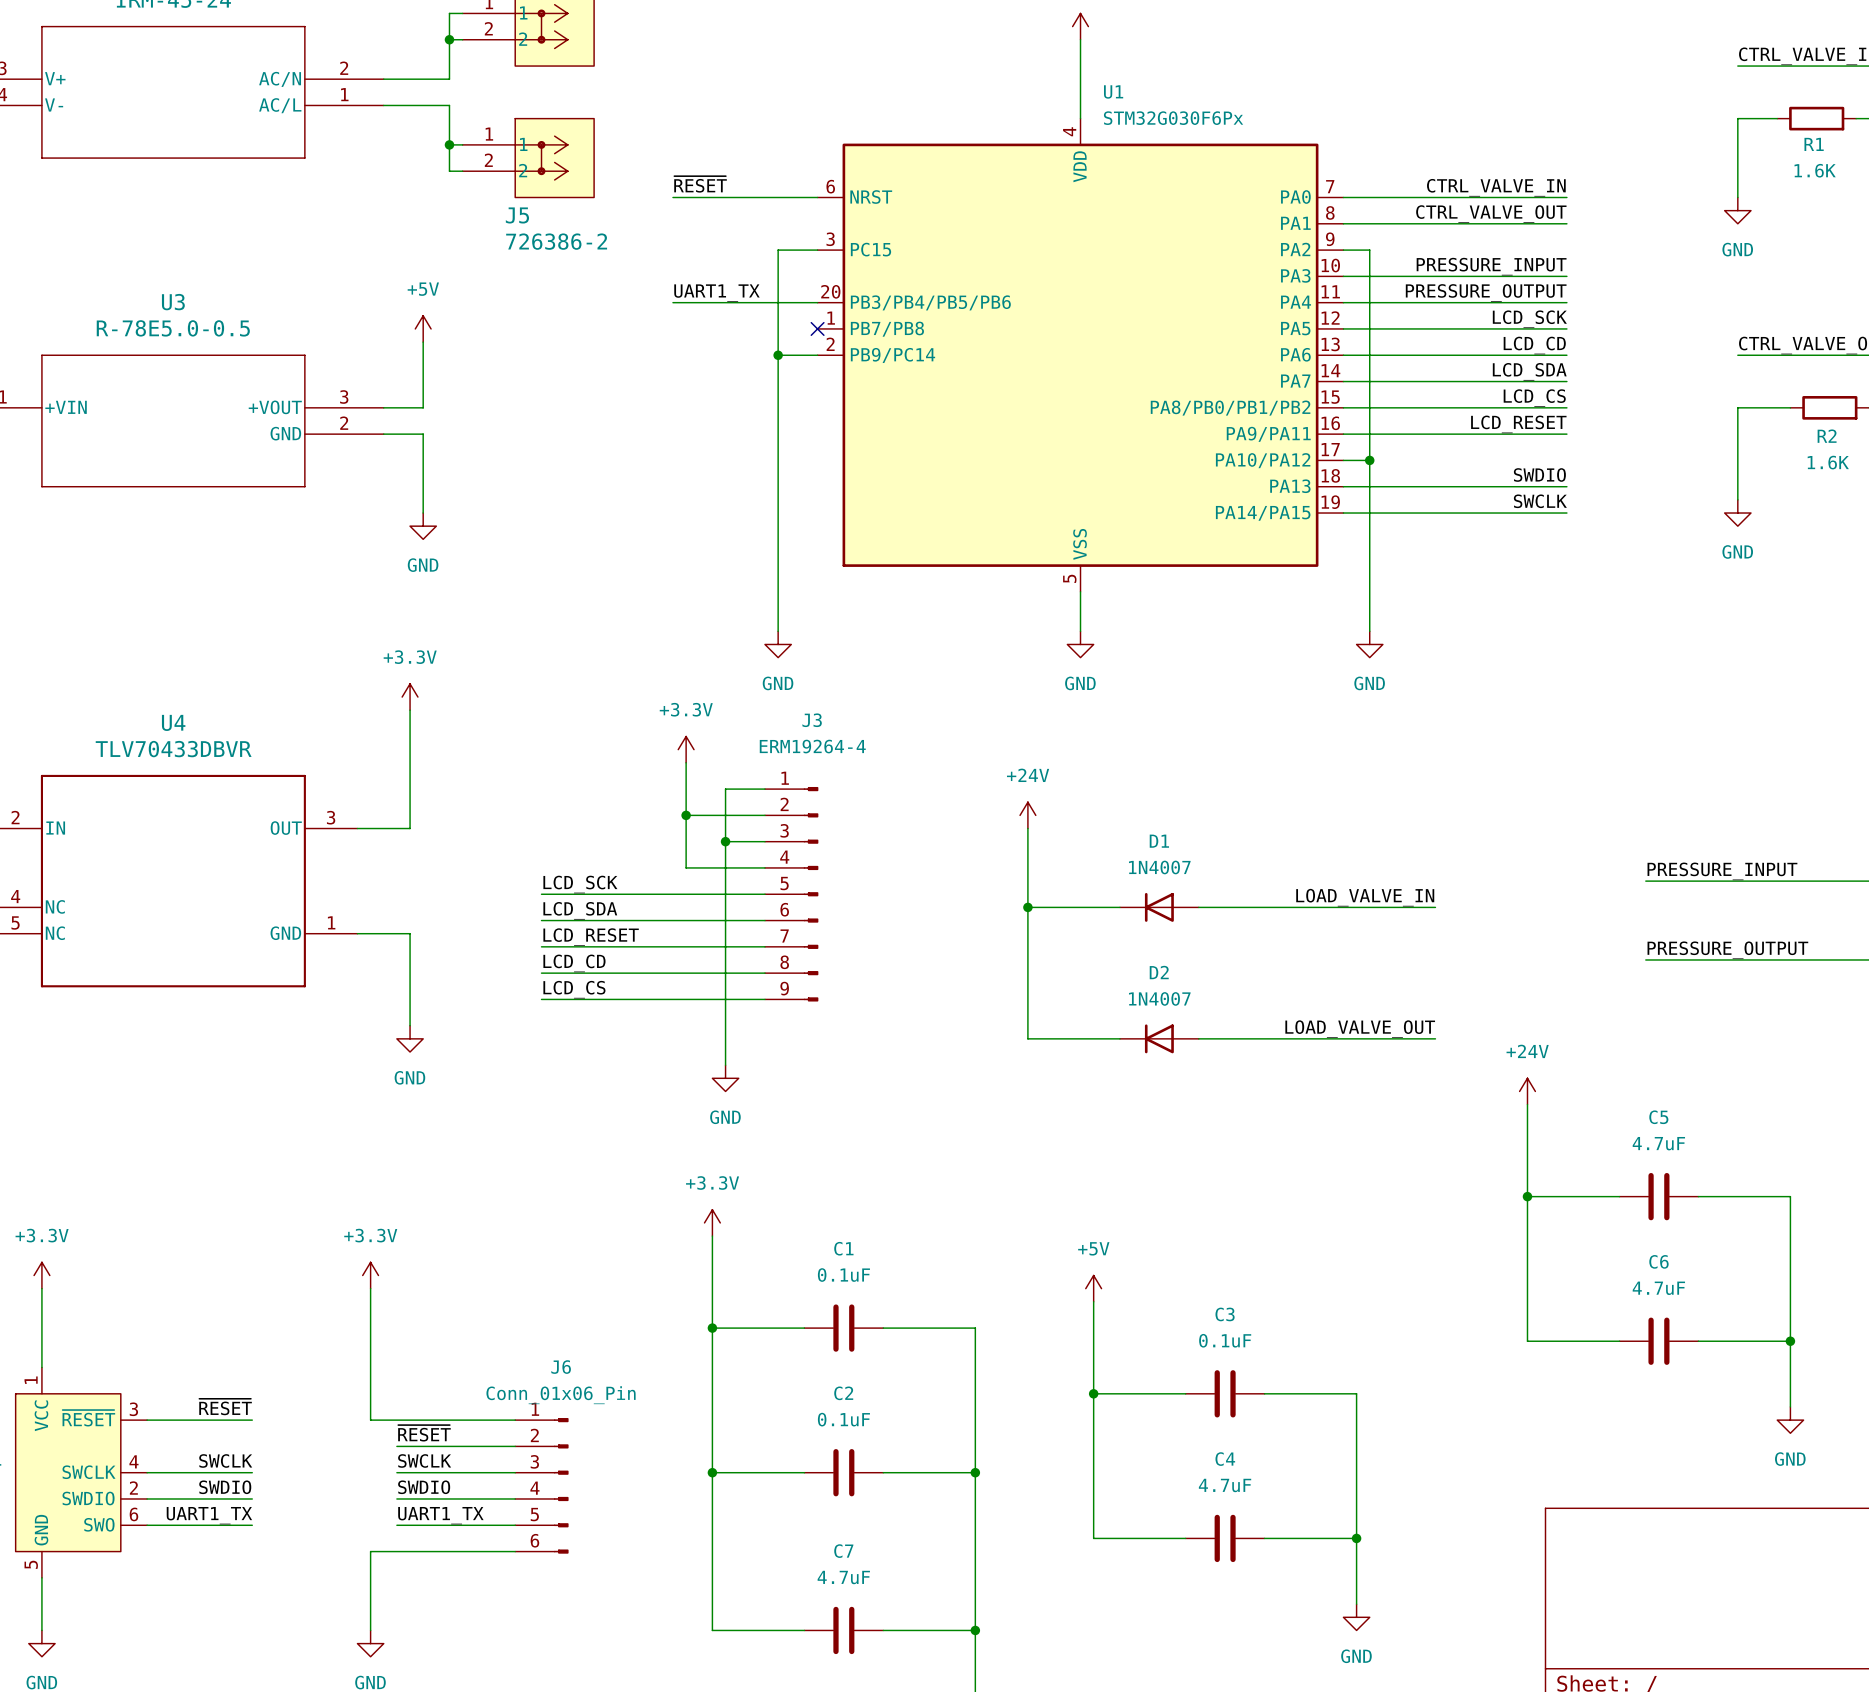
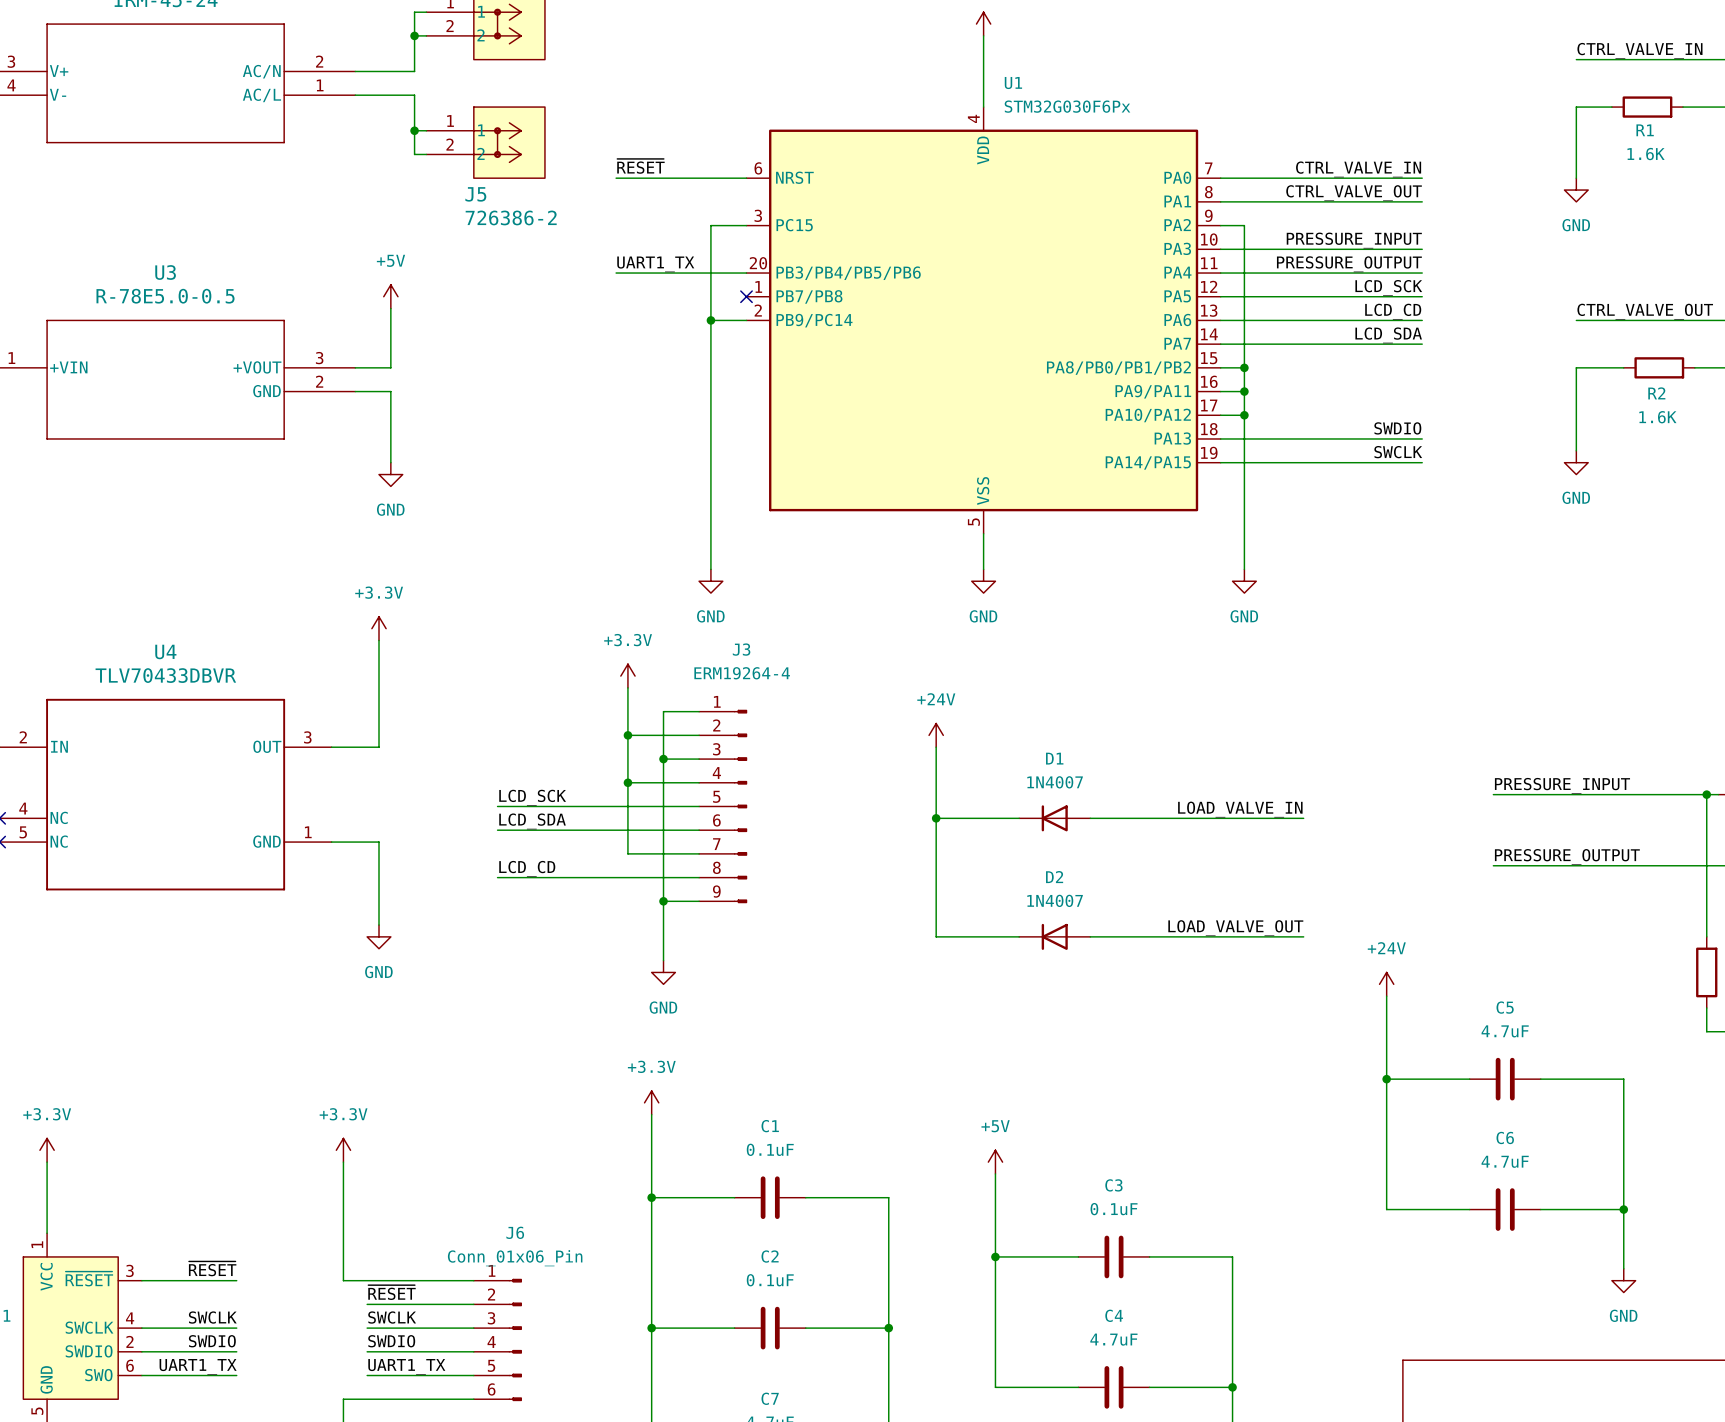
label: LCD_CS (1534, 398) -> none
wire: (1369, 407) (1566, 407) -> none
junction: none -> (1244, 367)
label: LCD_RESET (1518, 424) -> none
wire: (1369, 434) (1566, 434) -> none
junction: none -> (1244, 391)
junction: none -> (627, 782)
label: LCD_RESET (591, 937) -> none
wire: (541, 946) (686, 946) -> (627, 782) (627, 853)
label: LCD_CS (574, 989) -> none
wire: (541, 999) (725, 999) -> none
junction: none -> (663, 901)

